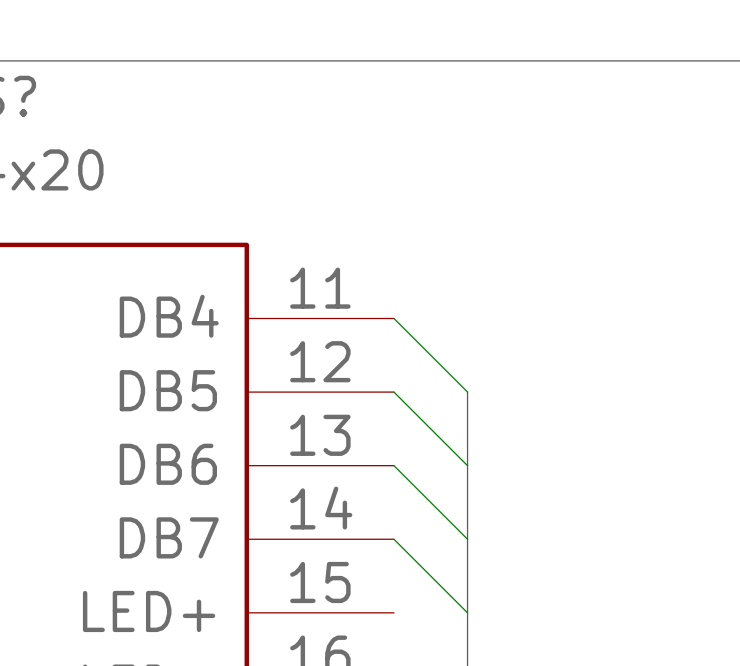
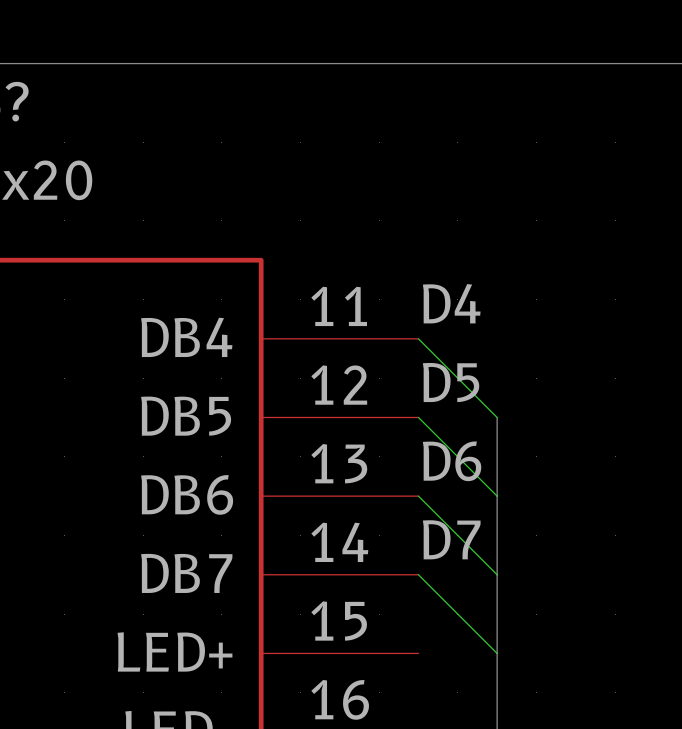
label: none -> D4 (451, 303)
label: none -> D5 (451, 382)
label: none -> D6 (452, 461)
label: none -> D7 (451, 539)

